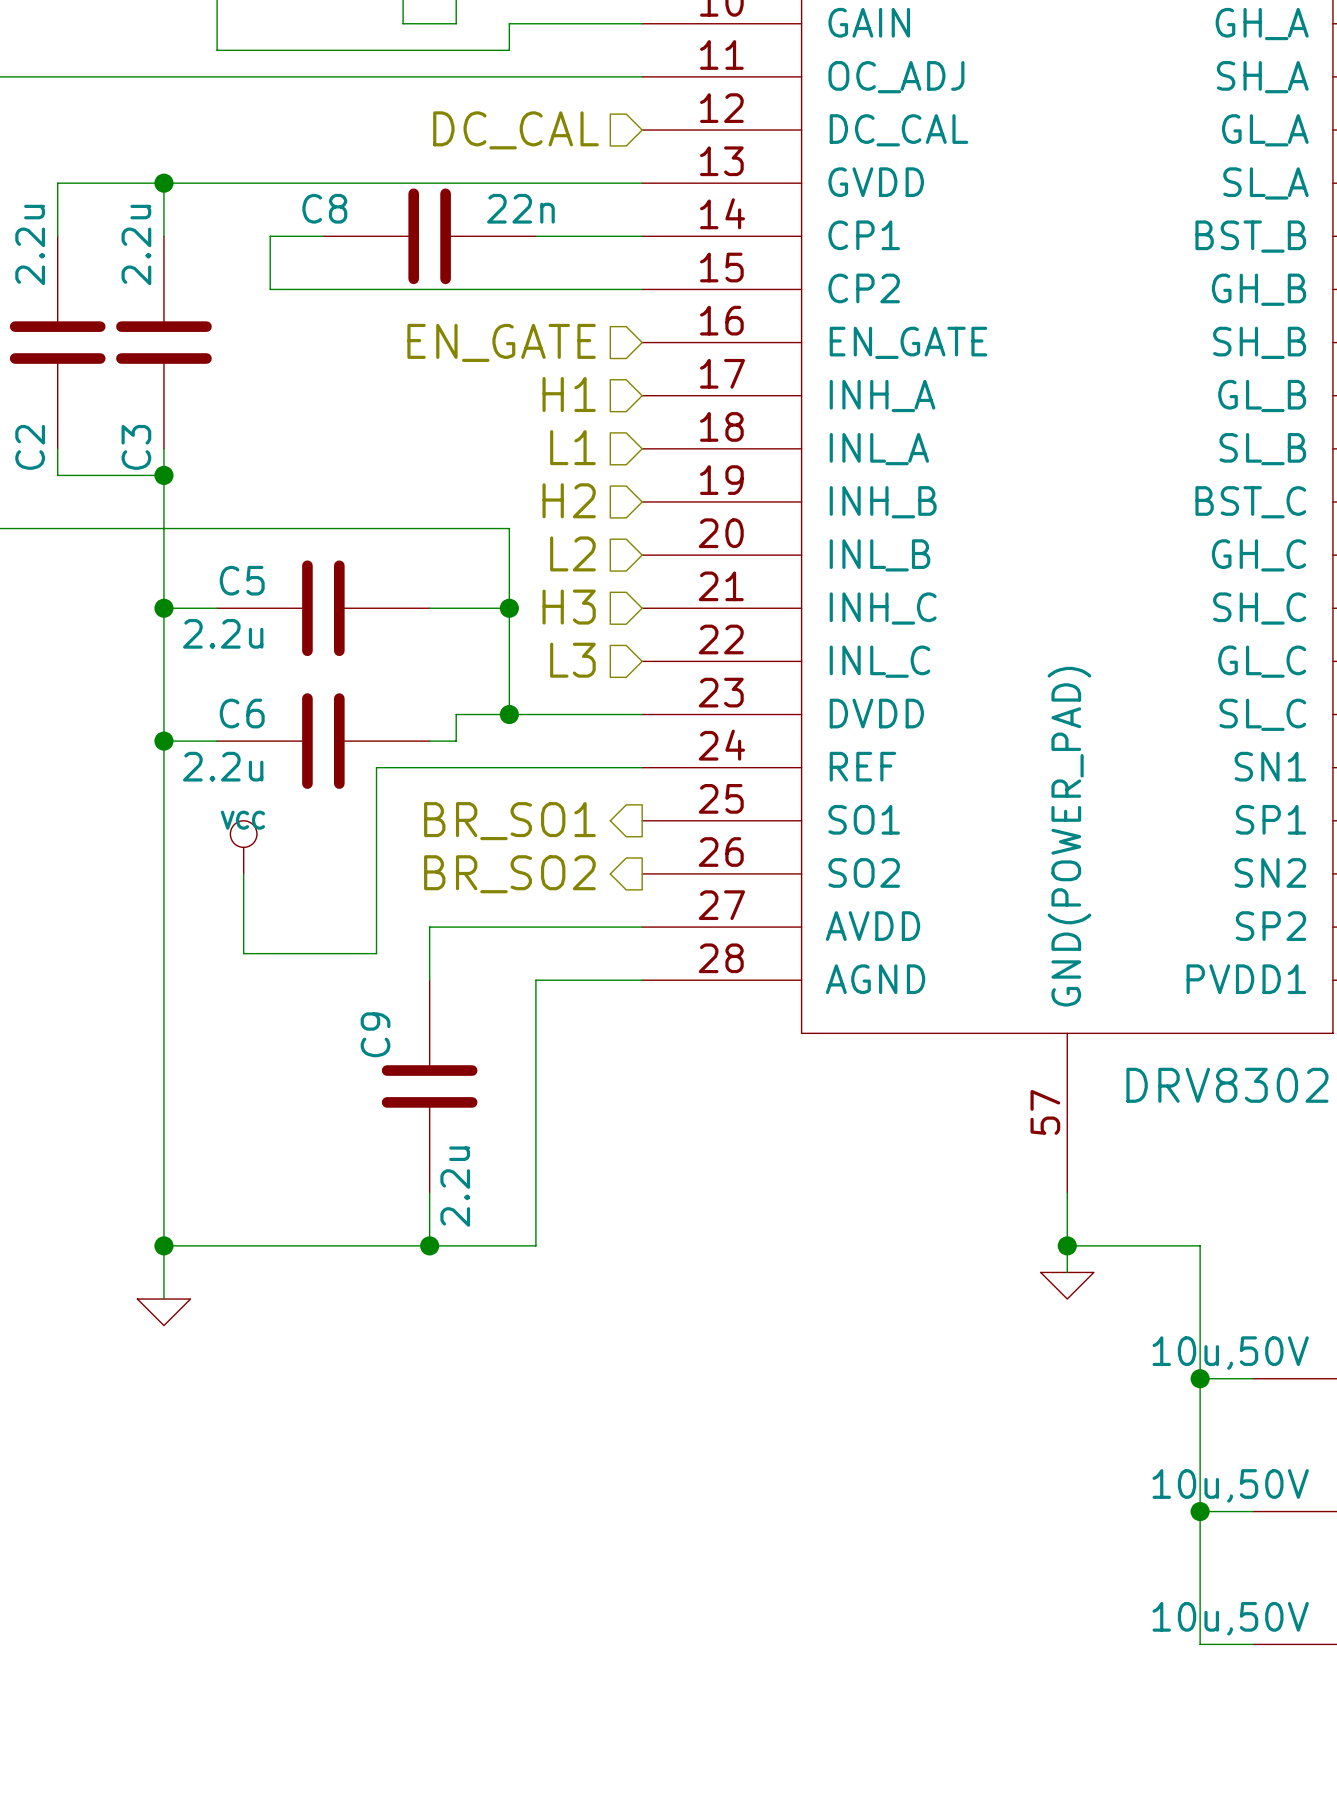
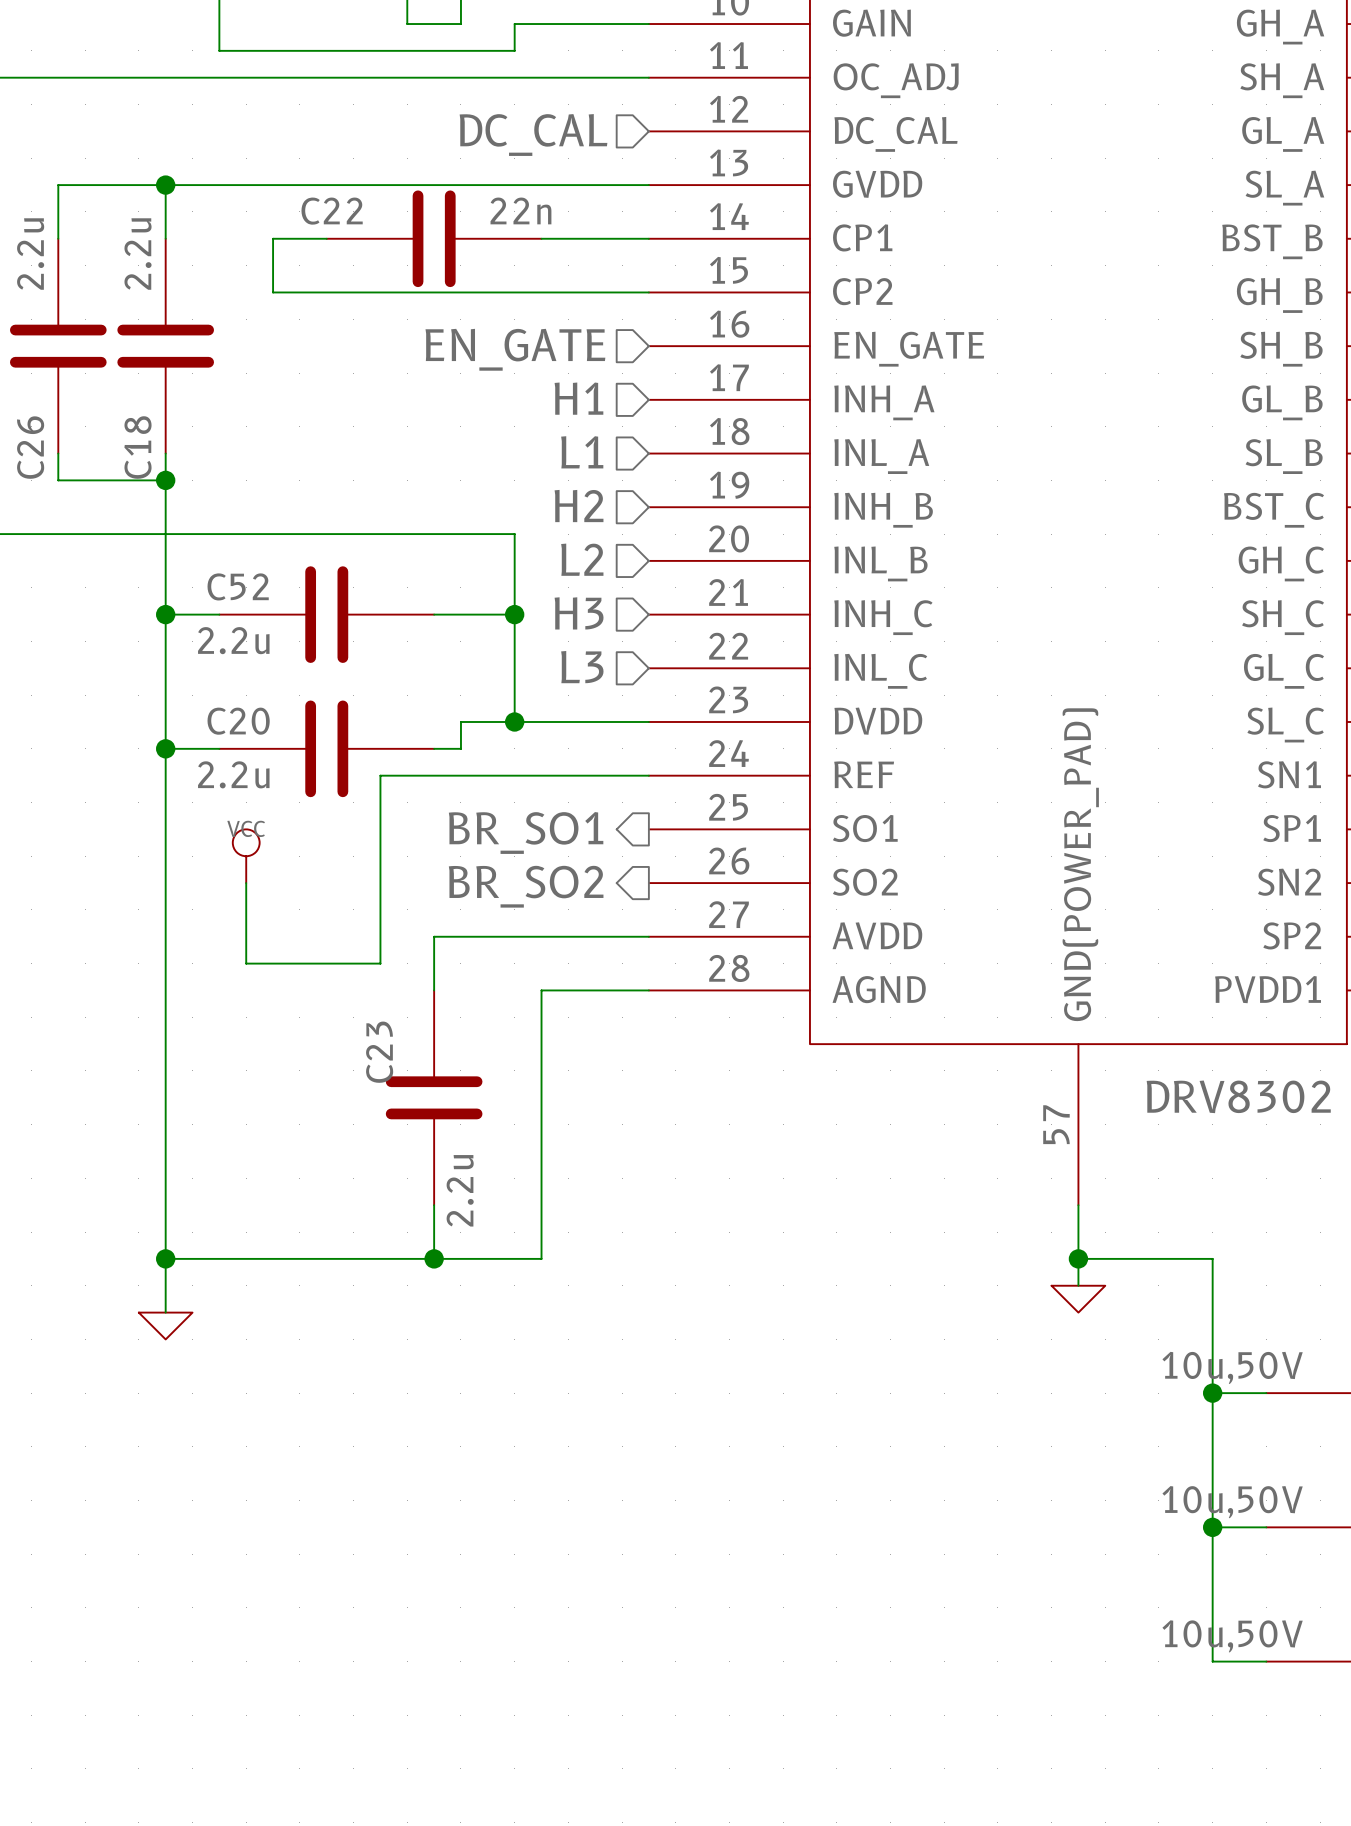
C8 name: C8 (324, 208) -> C22 (332, 211)
C2 name: C2 (30, 447) -> C26 (30, 447)
C3 name: C3 (136, 447) -> C18 (137, 447)
C5 name: C5 (242, 580) -> C52 (238, 586)
C6 name: C6 (242, 713) -> C20 (238, 721)
C9 name: C9 (375, 1034) -> C23 (379, 1052)

